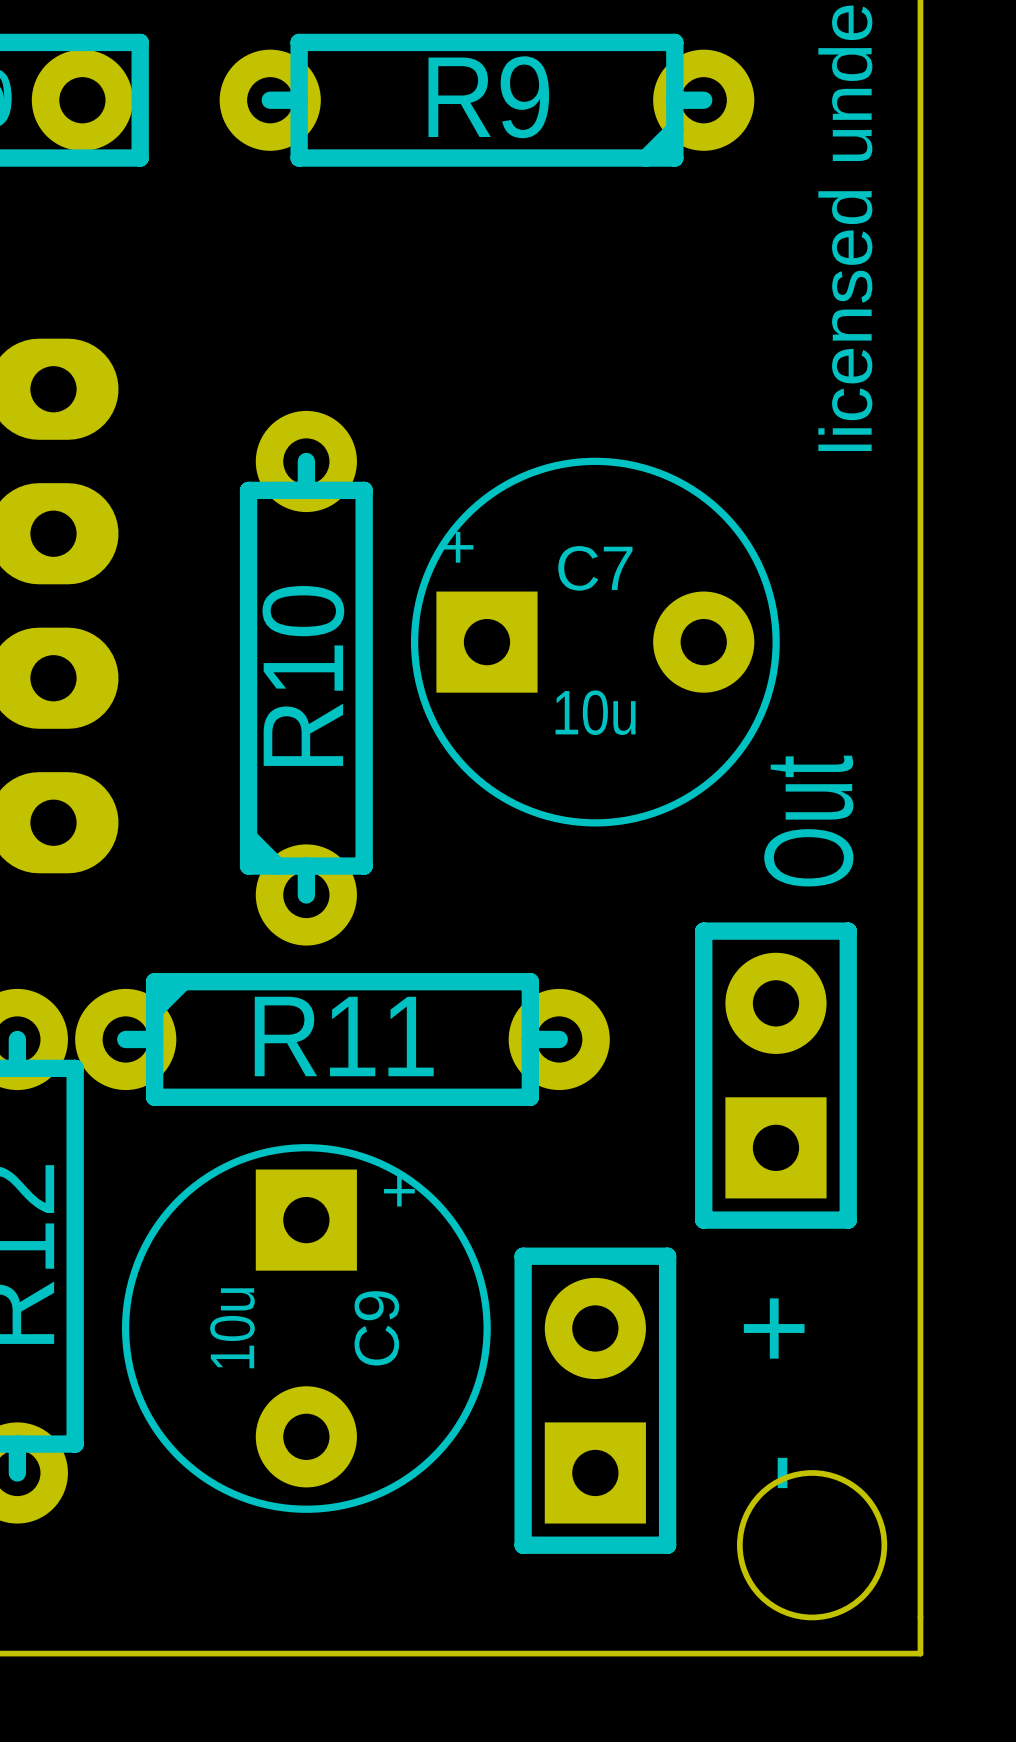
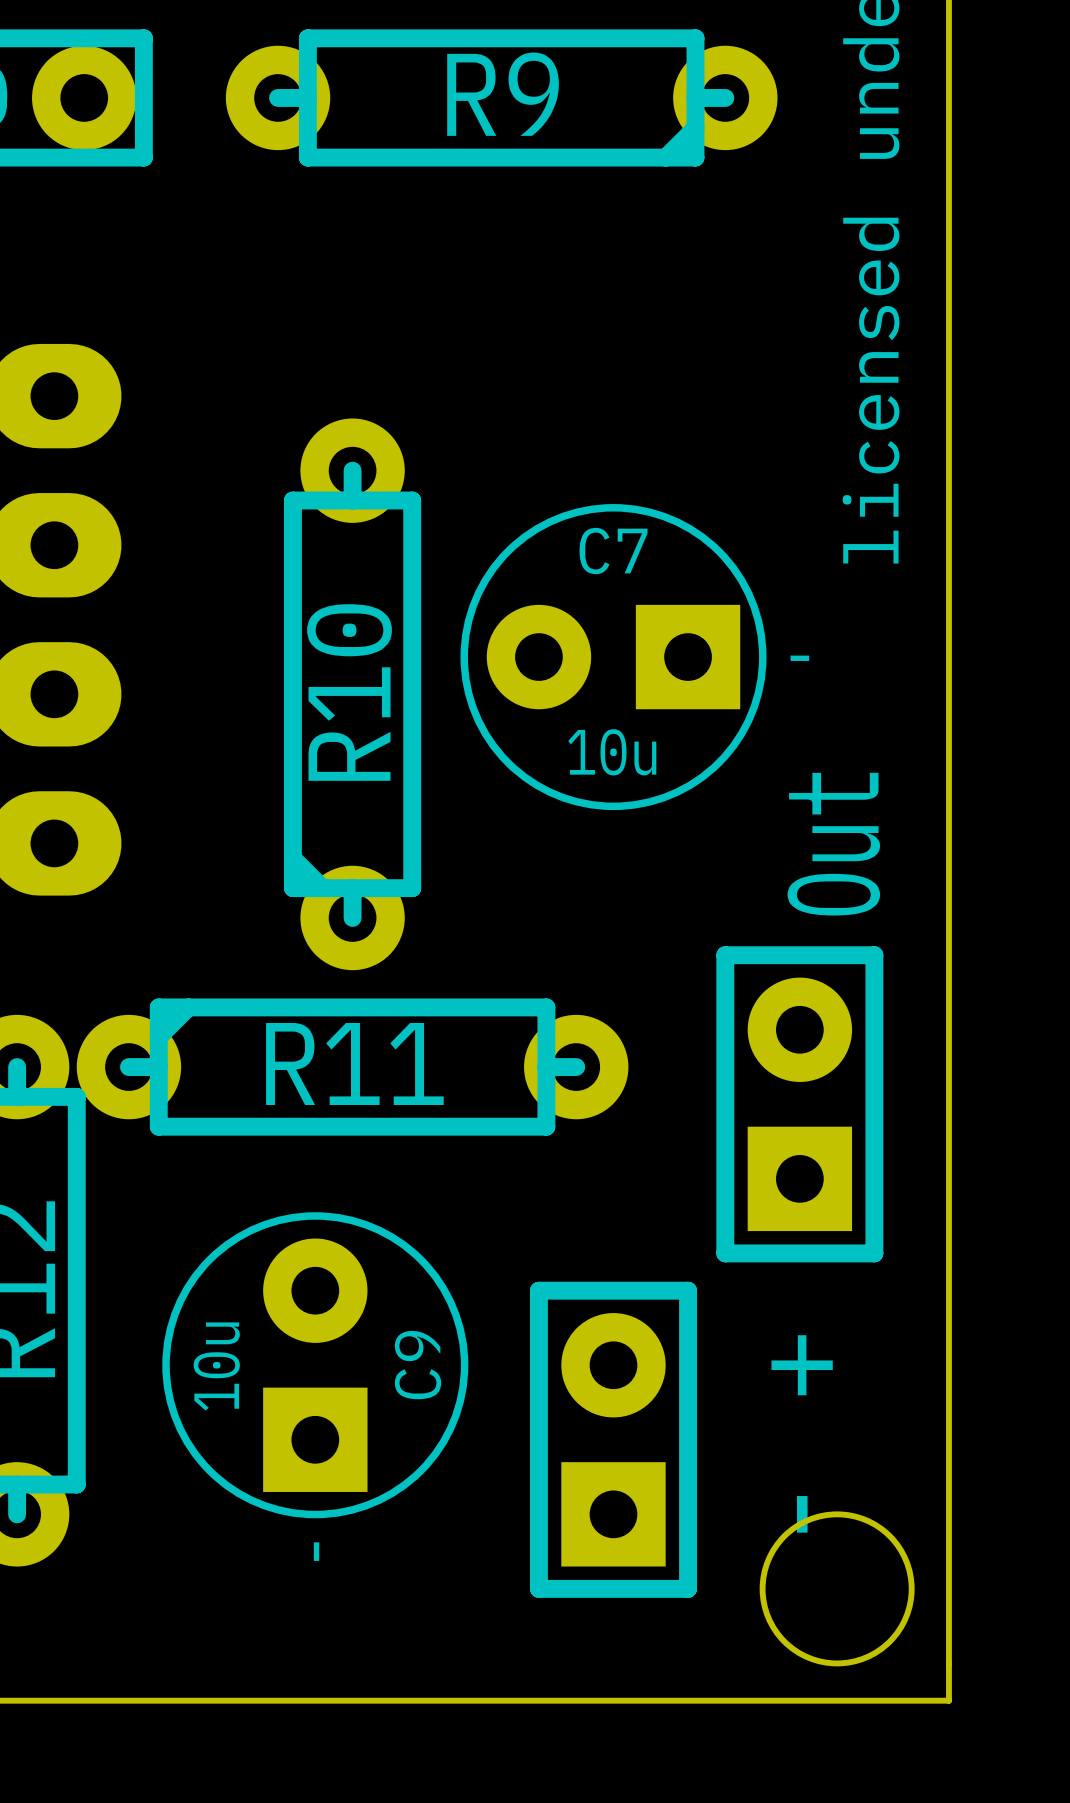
C7 footprint: [410, 457, 780, 827] -> [460, 504, 767, 811]
R10 position: (306, 678) -> (352, 694)
C9 footprint: [121, 1144, 491, 1513] -> [162, 1212, 469, 1519]

